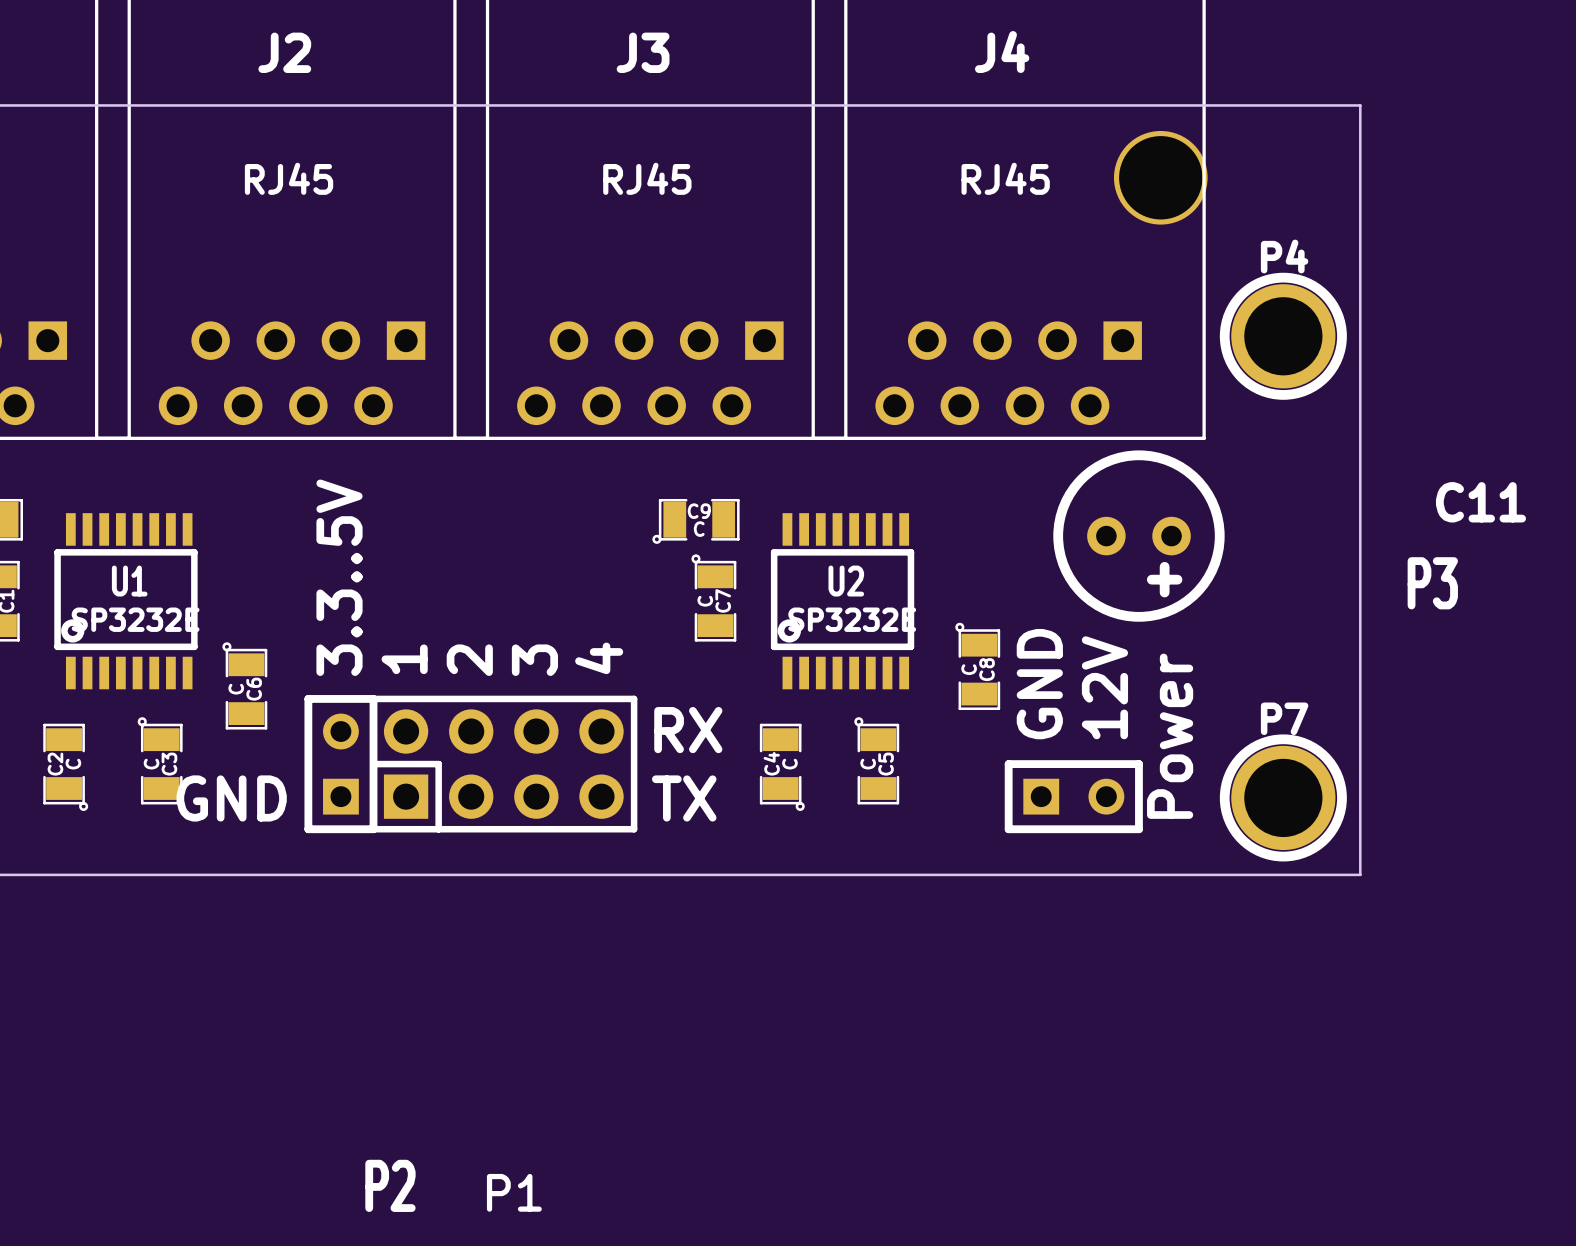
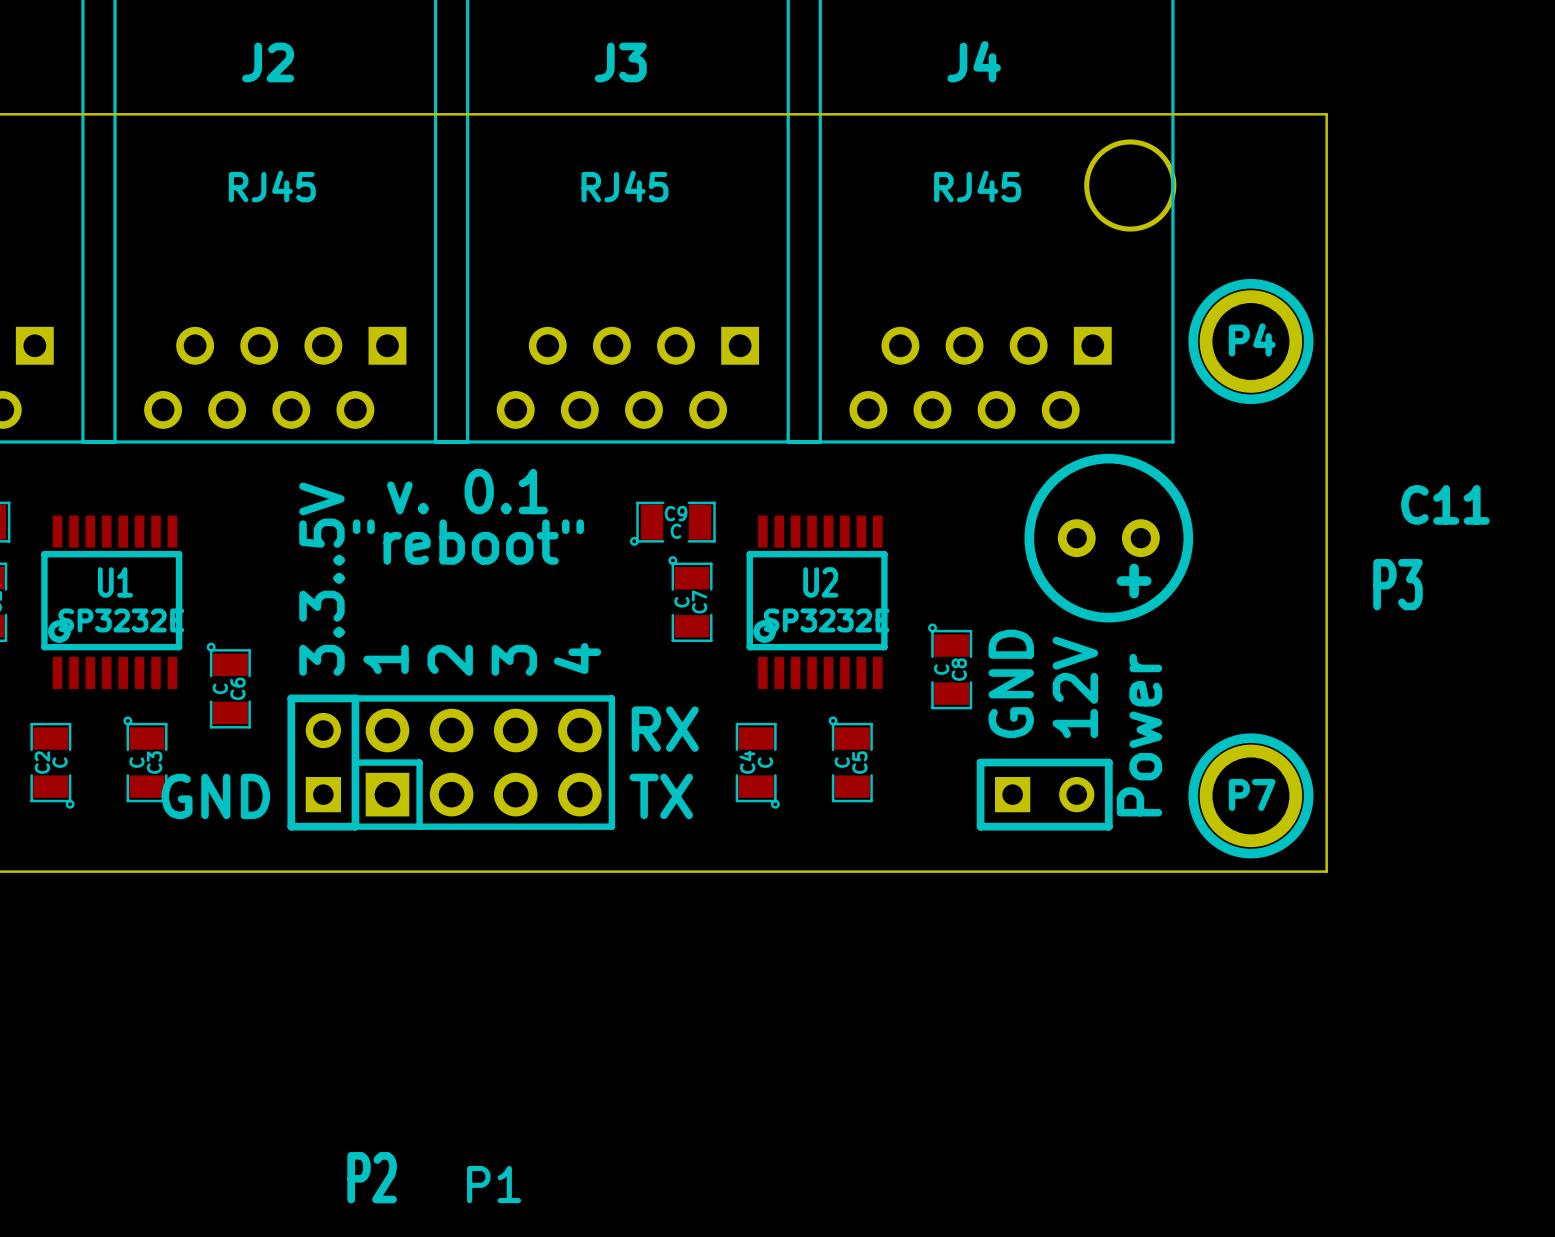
P4 name position: P4 (1284, 256) -> P4 (1252, 339)
text: none -> v. 0.1 (467, 491)
text: none -> "reboot" (468, 542)
P7 name position: P7 (1284, 718) -> P7 (1252, 794)

